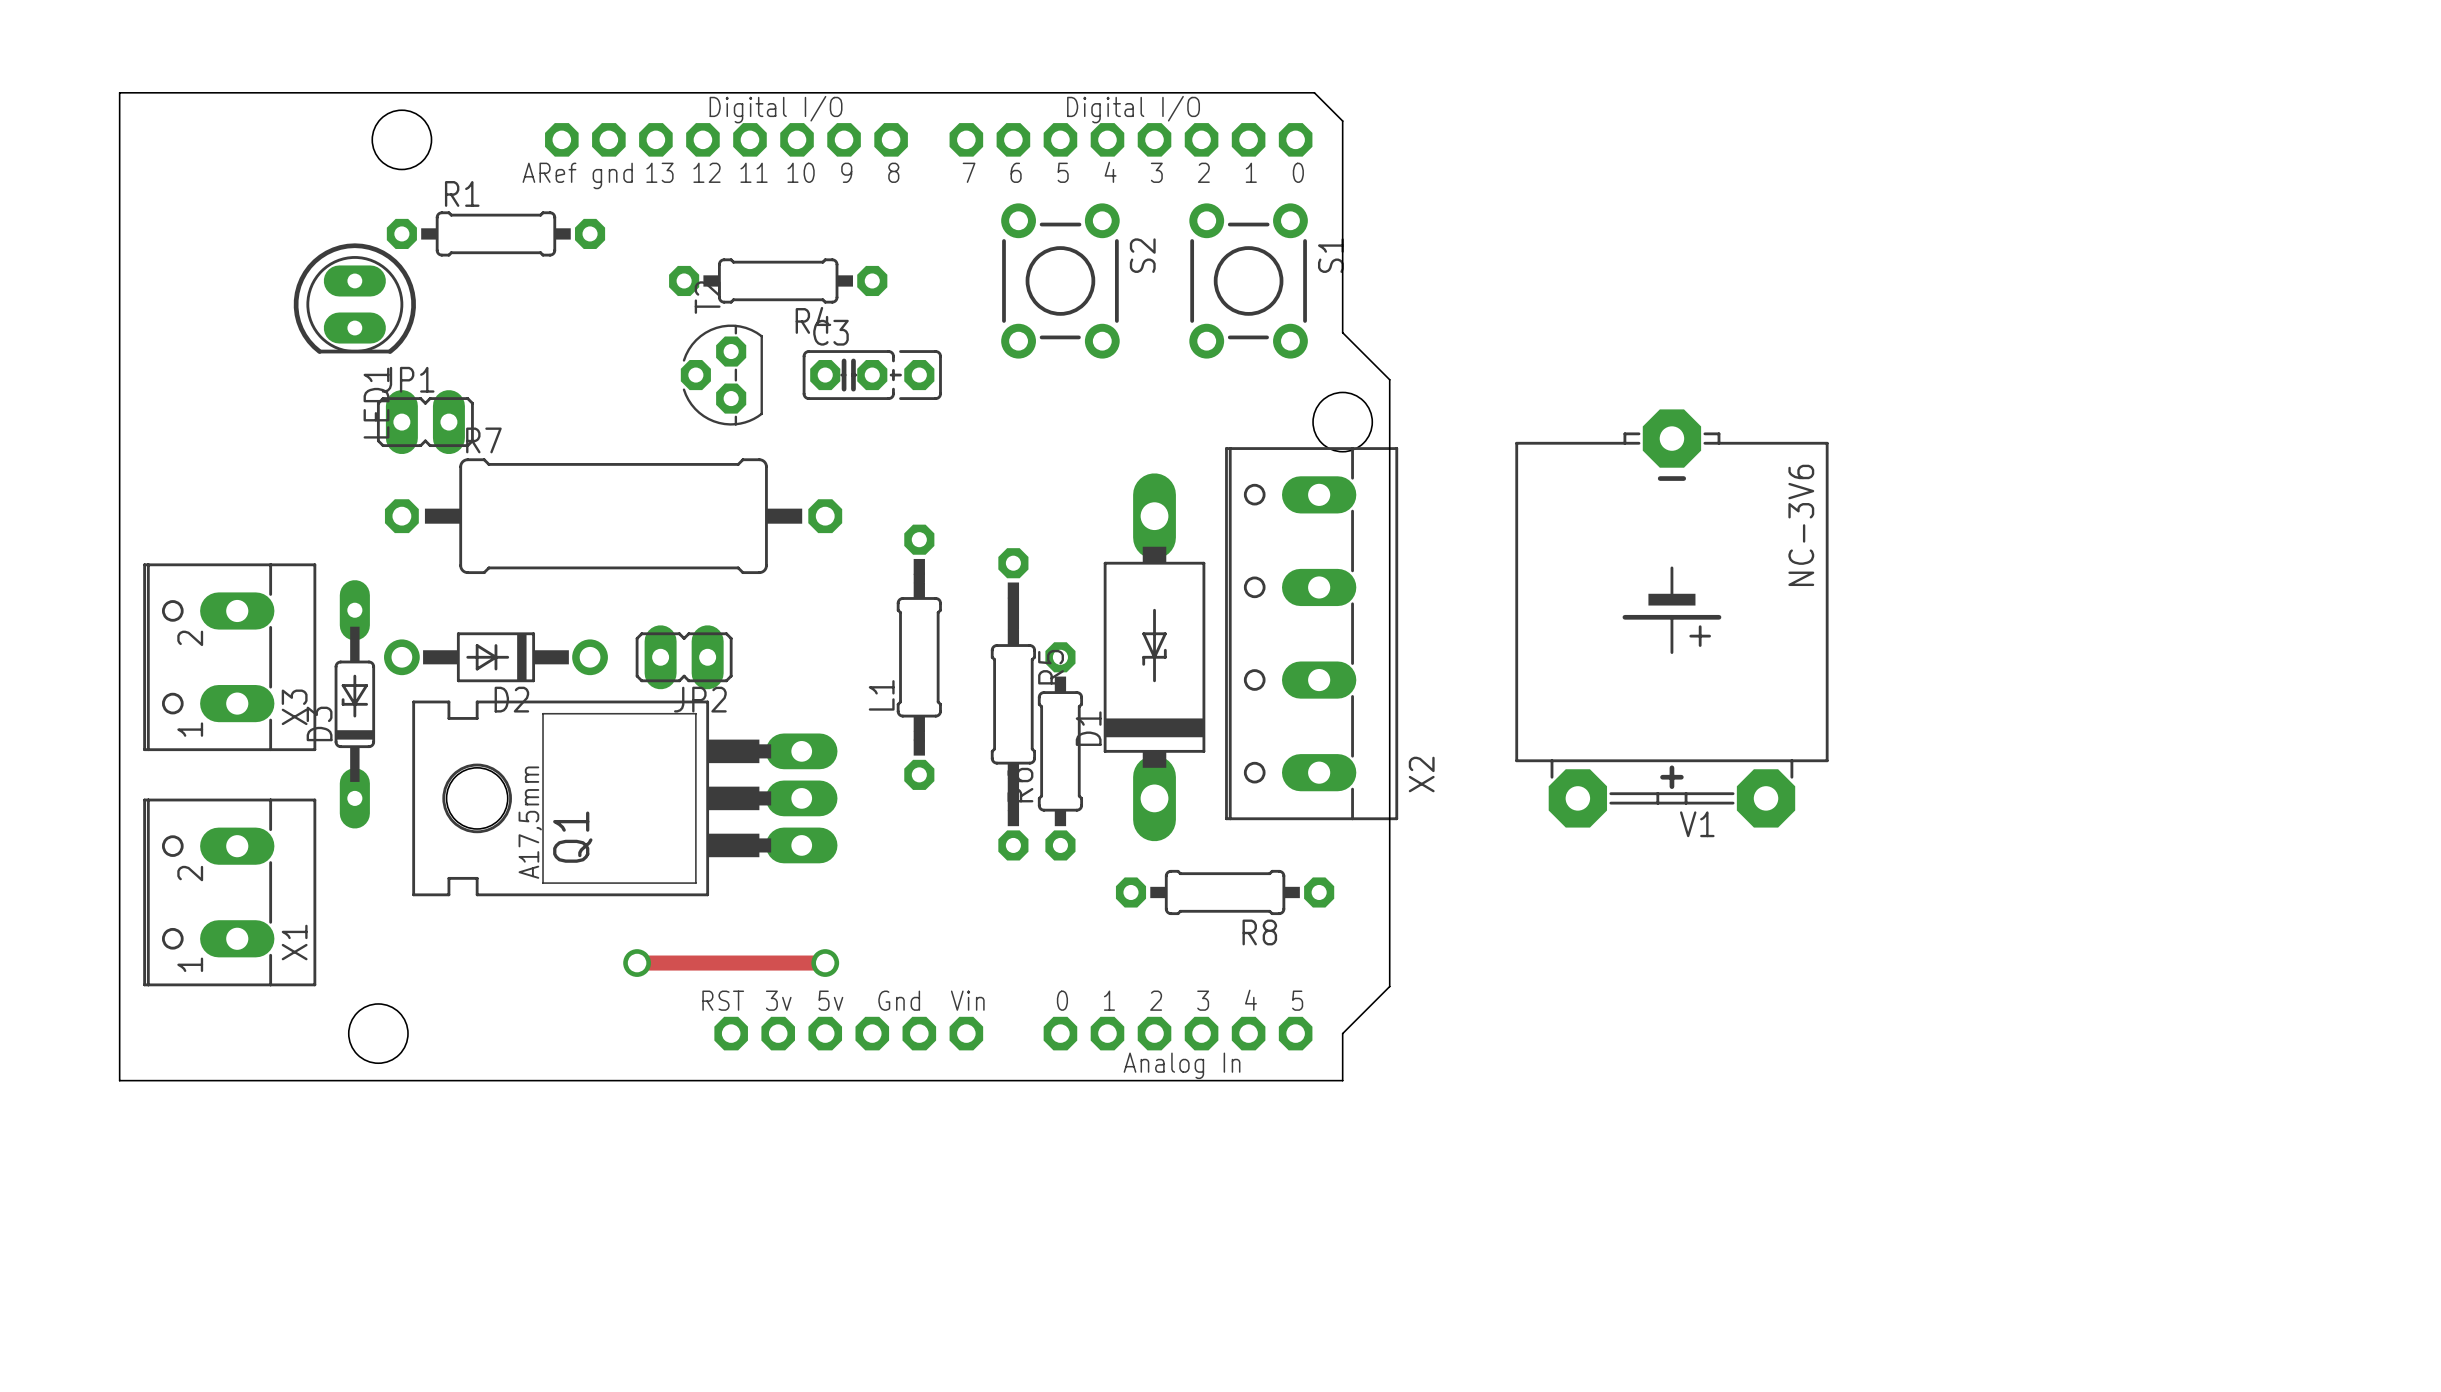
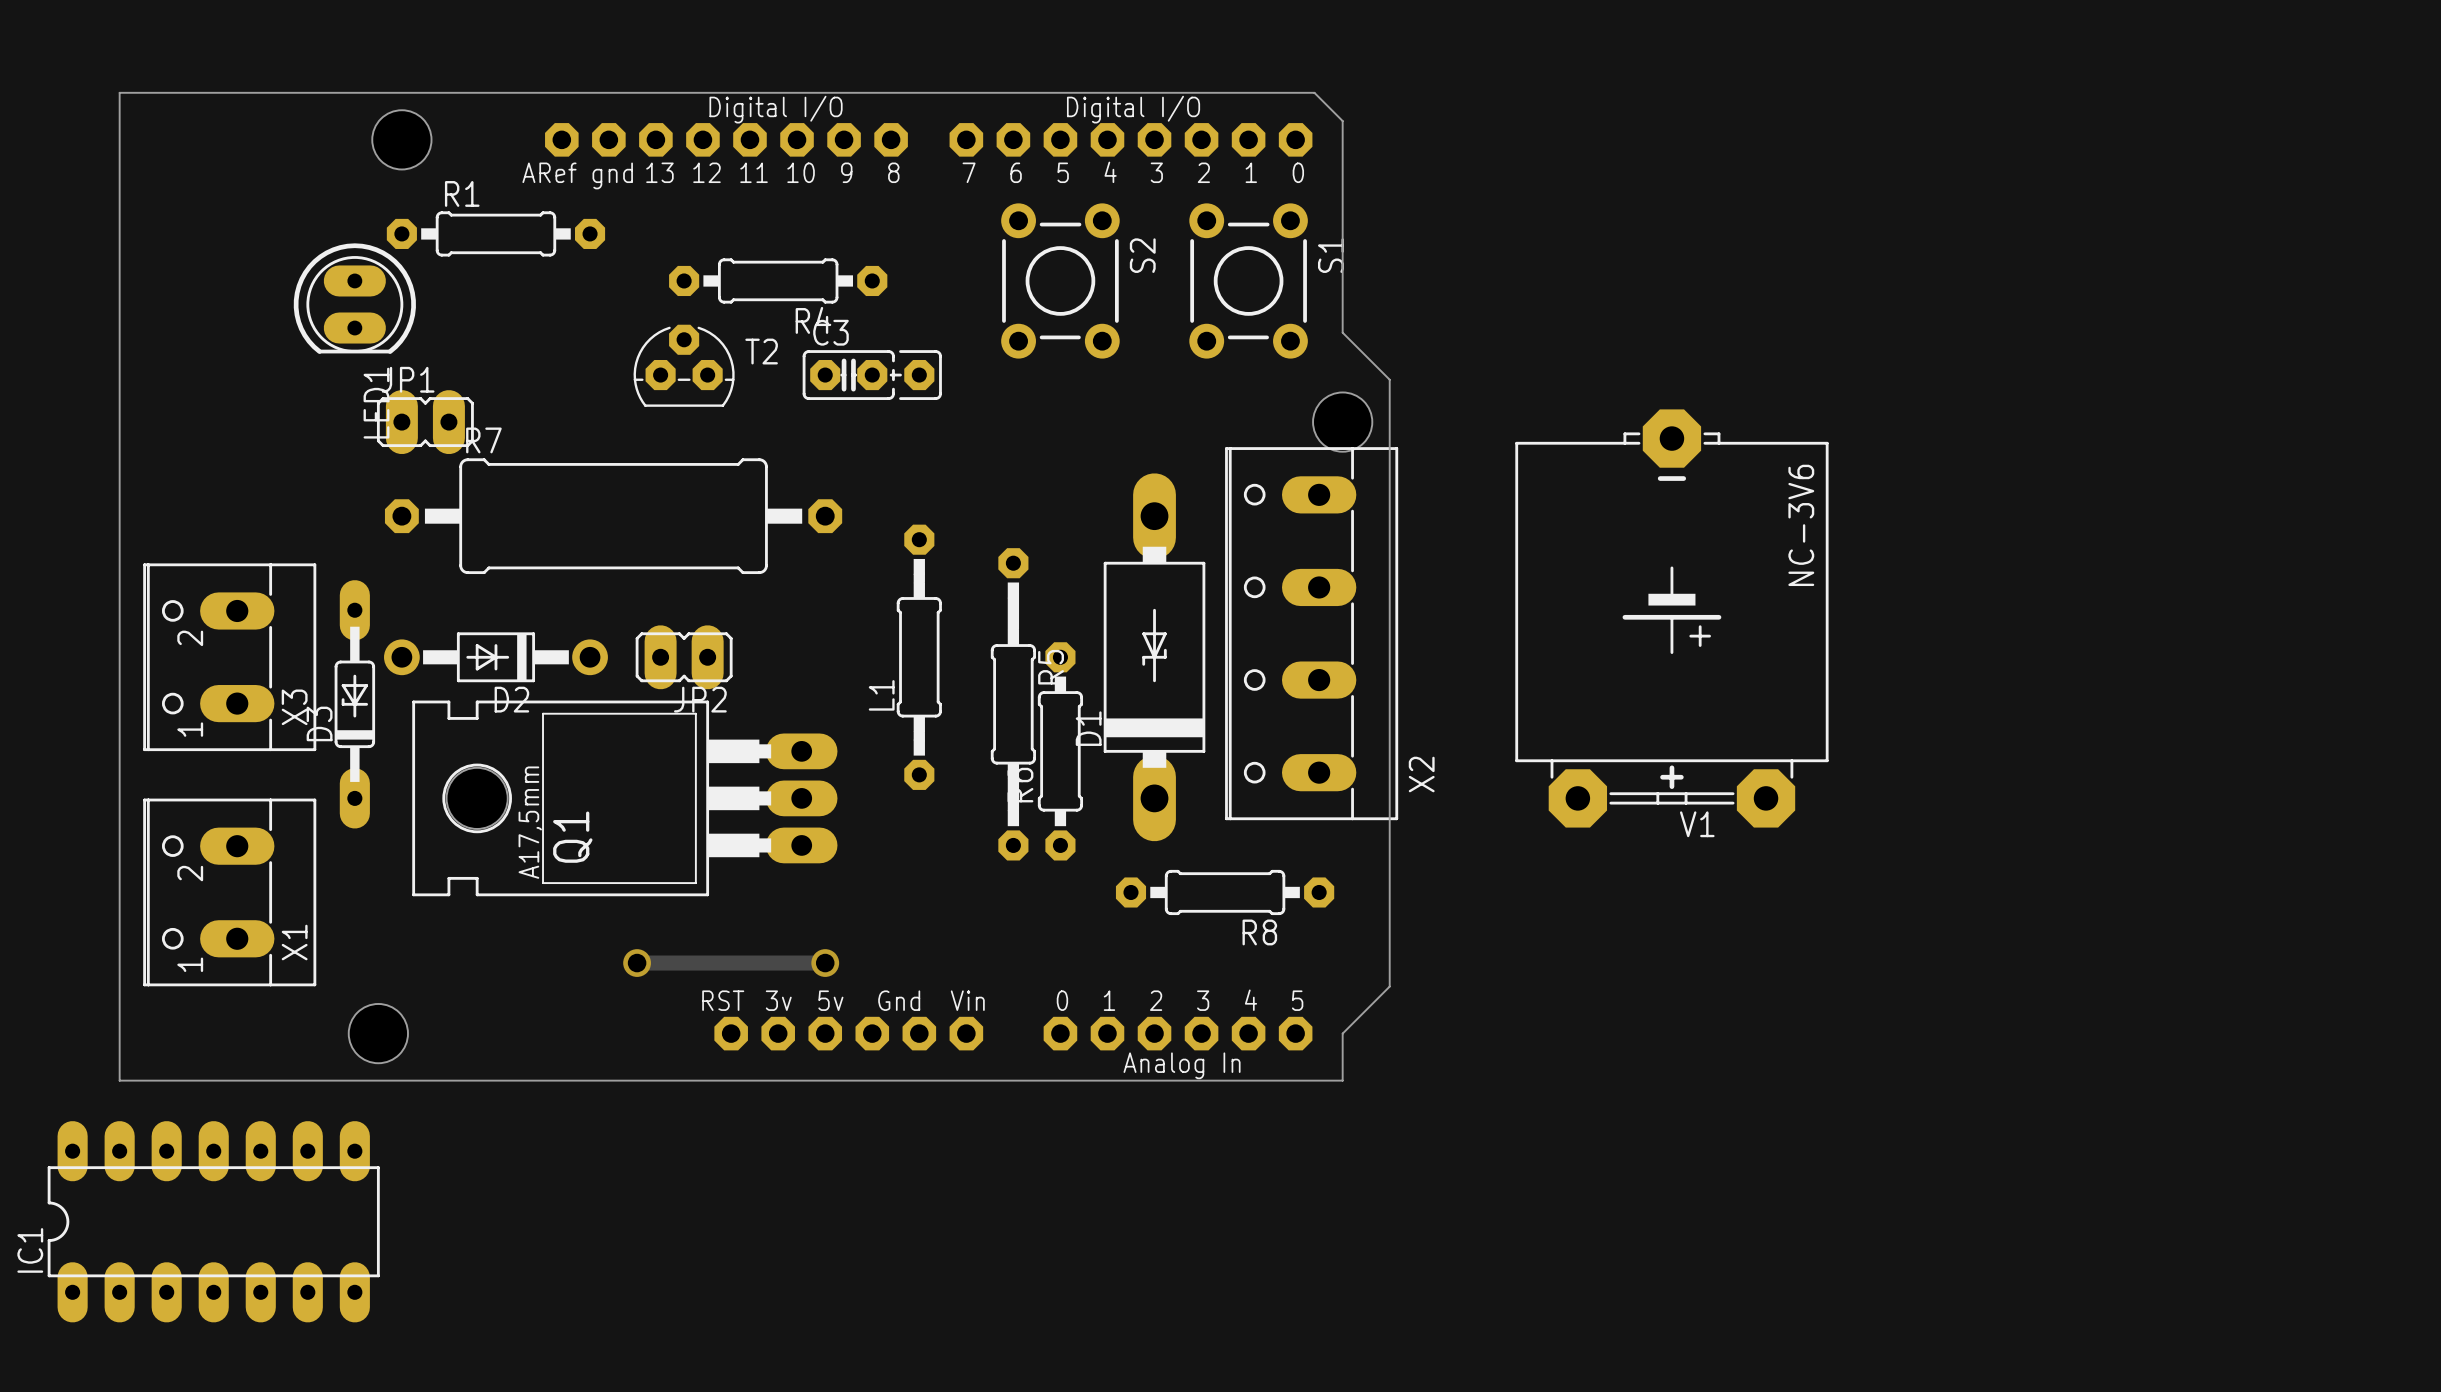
T2 rotation: 0° (721, 375) -> 90° clockwise (684, 365)
IC1: none -> (213, 1221)

